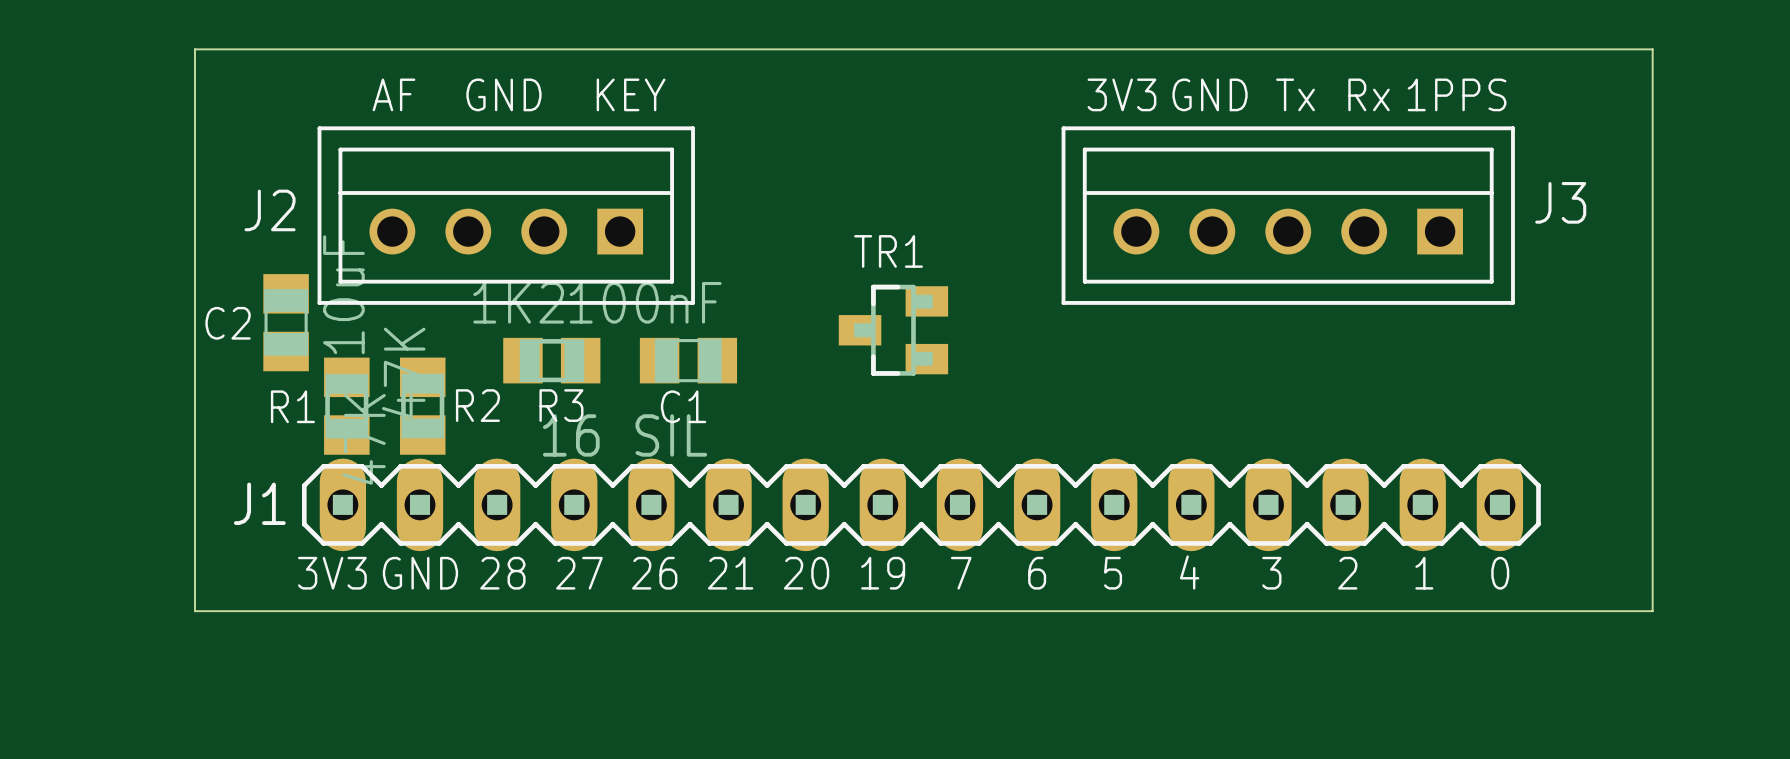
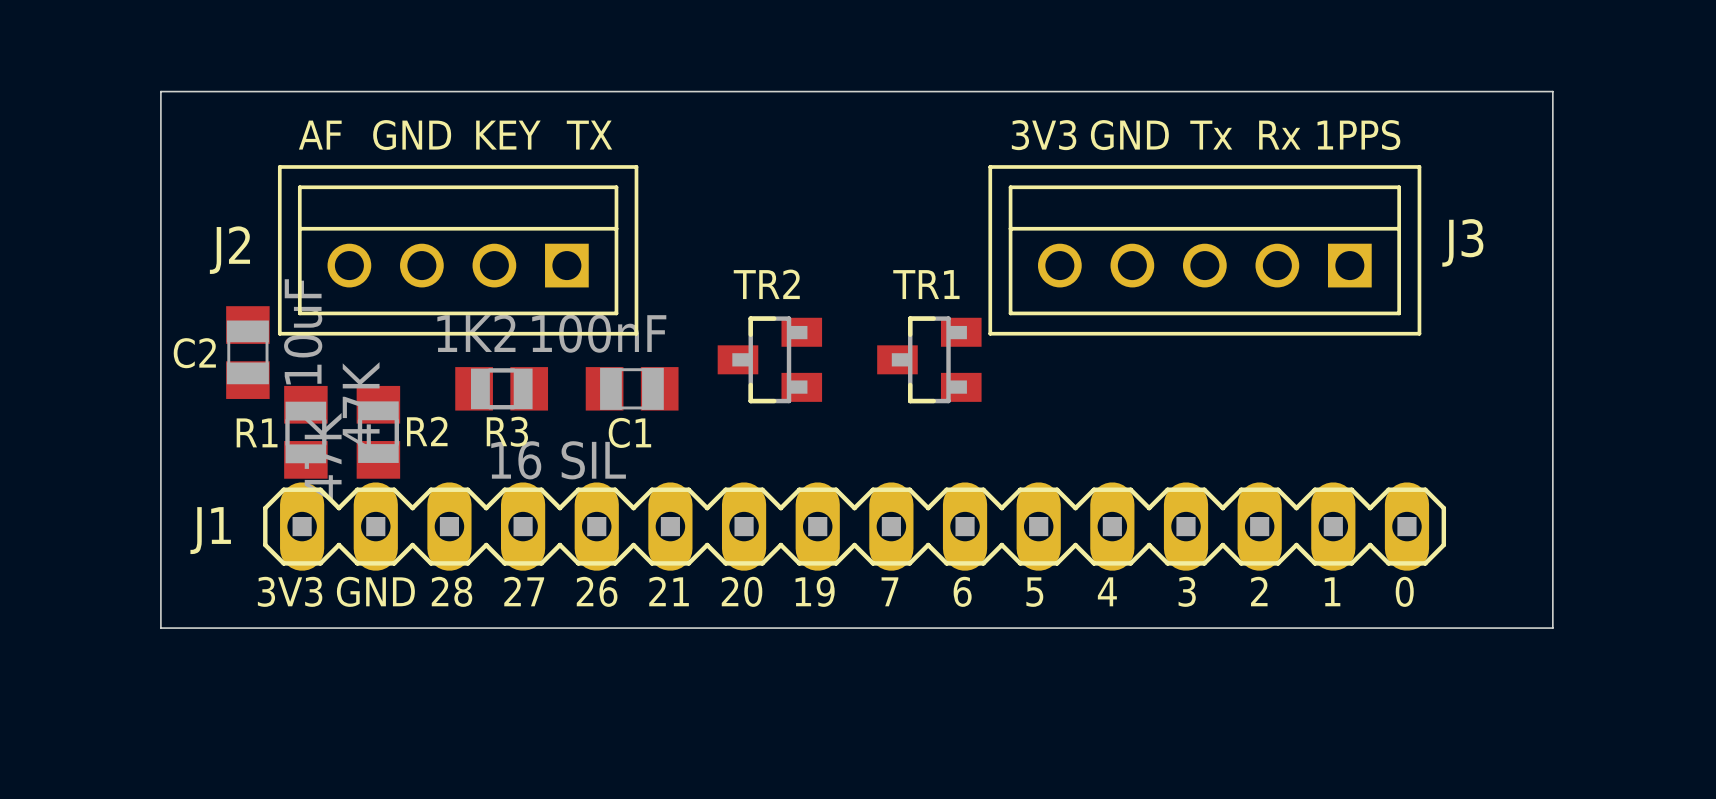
text position: AF (393, 94) -> AF (320, 135)
text position: GND (503, 94) -> GND (412, 135)
text: none -> KEY (508, 135)
text: KEY (631, 94) -> TX (589, 135)
TR2: none -> (769, 359)
TR1 position: (893, 330) -> (929, 359)

